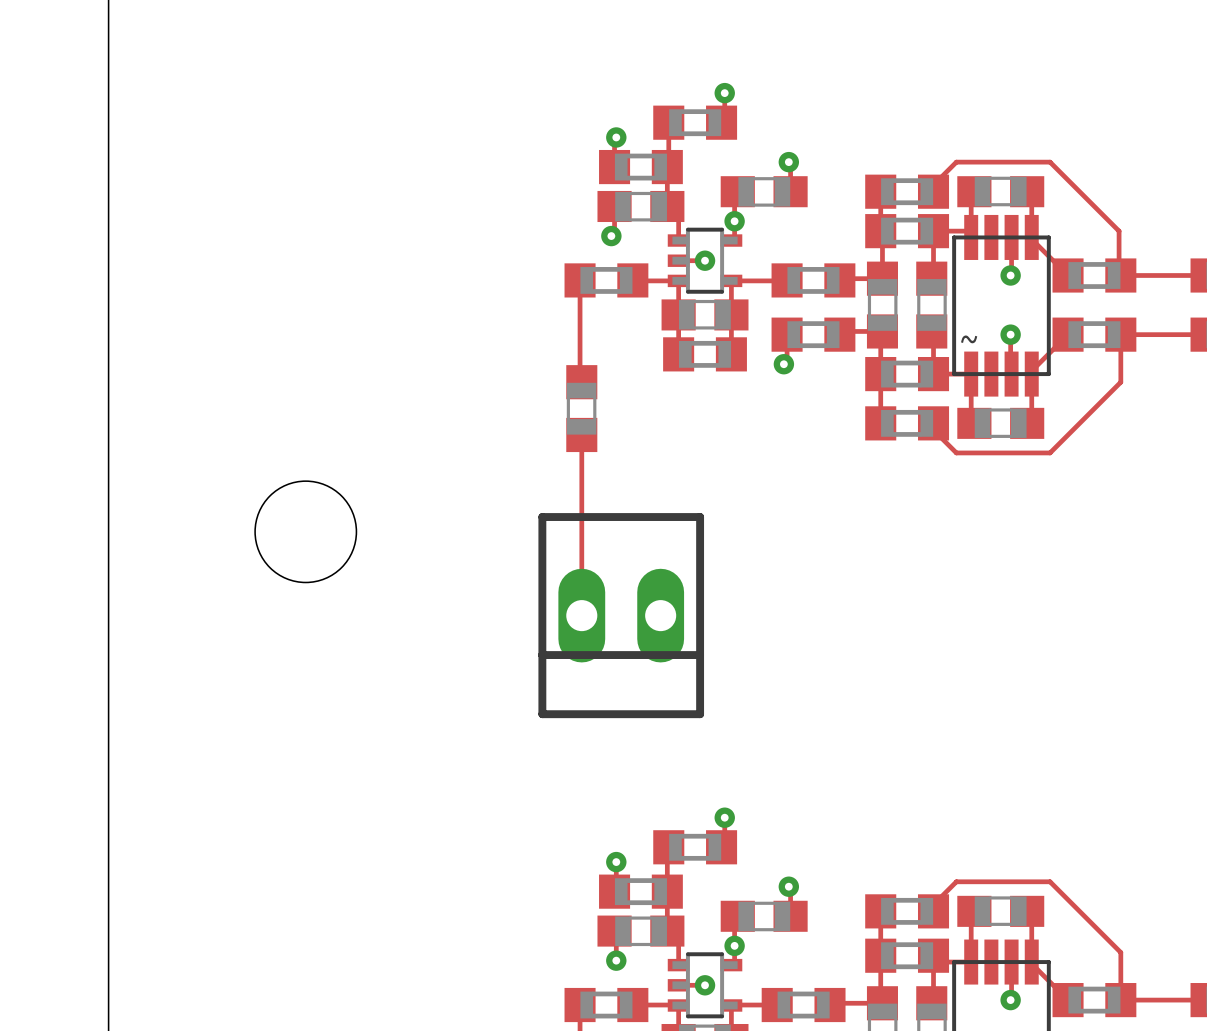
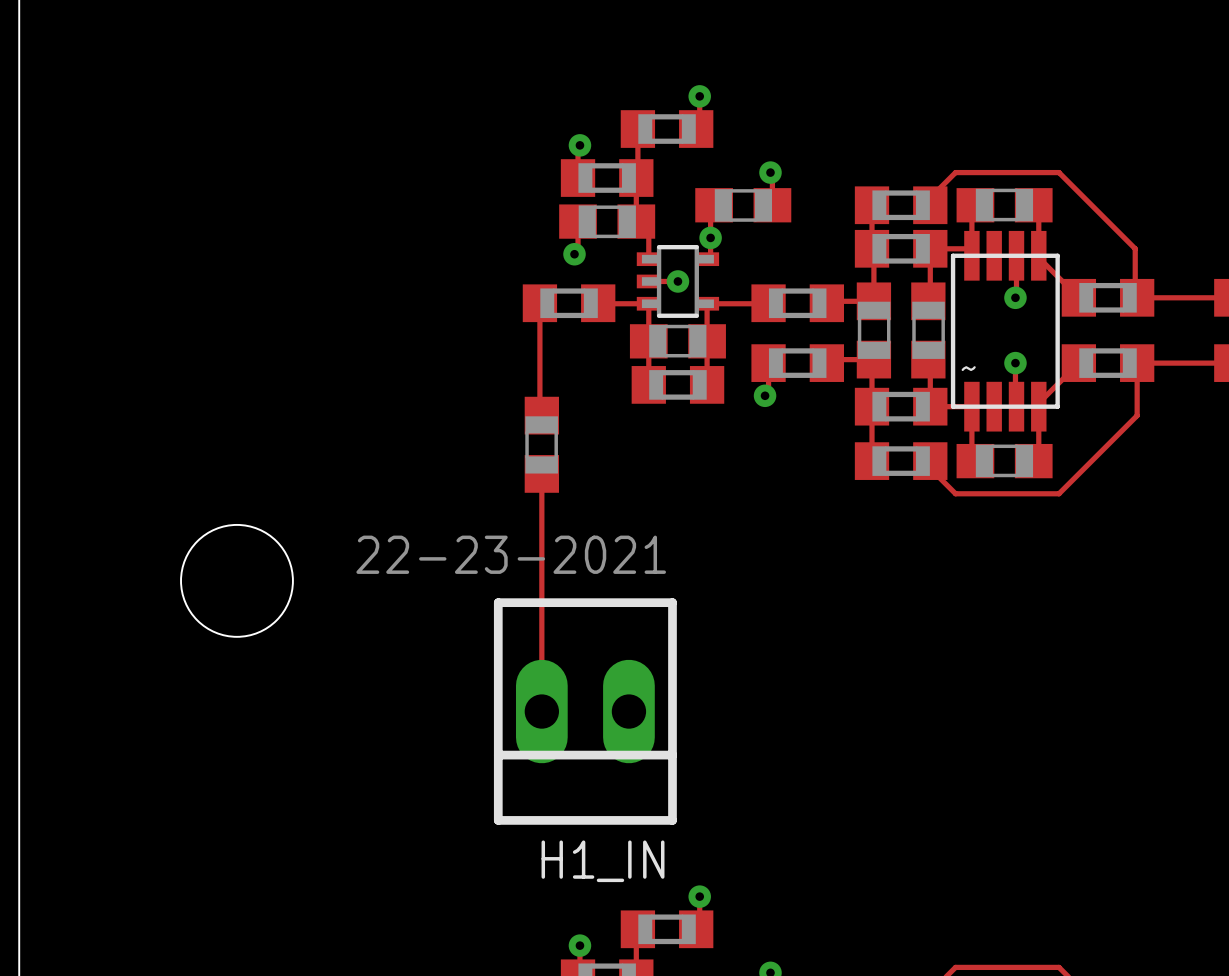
part: (621, 615) -> none
H1_IN: none -> 22-23-2021 (585, 711)

